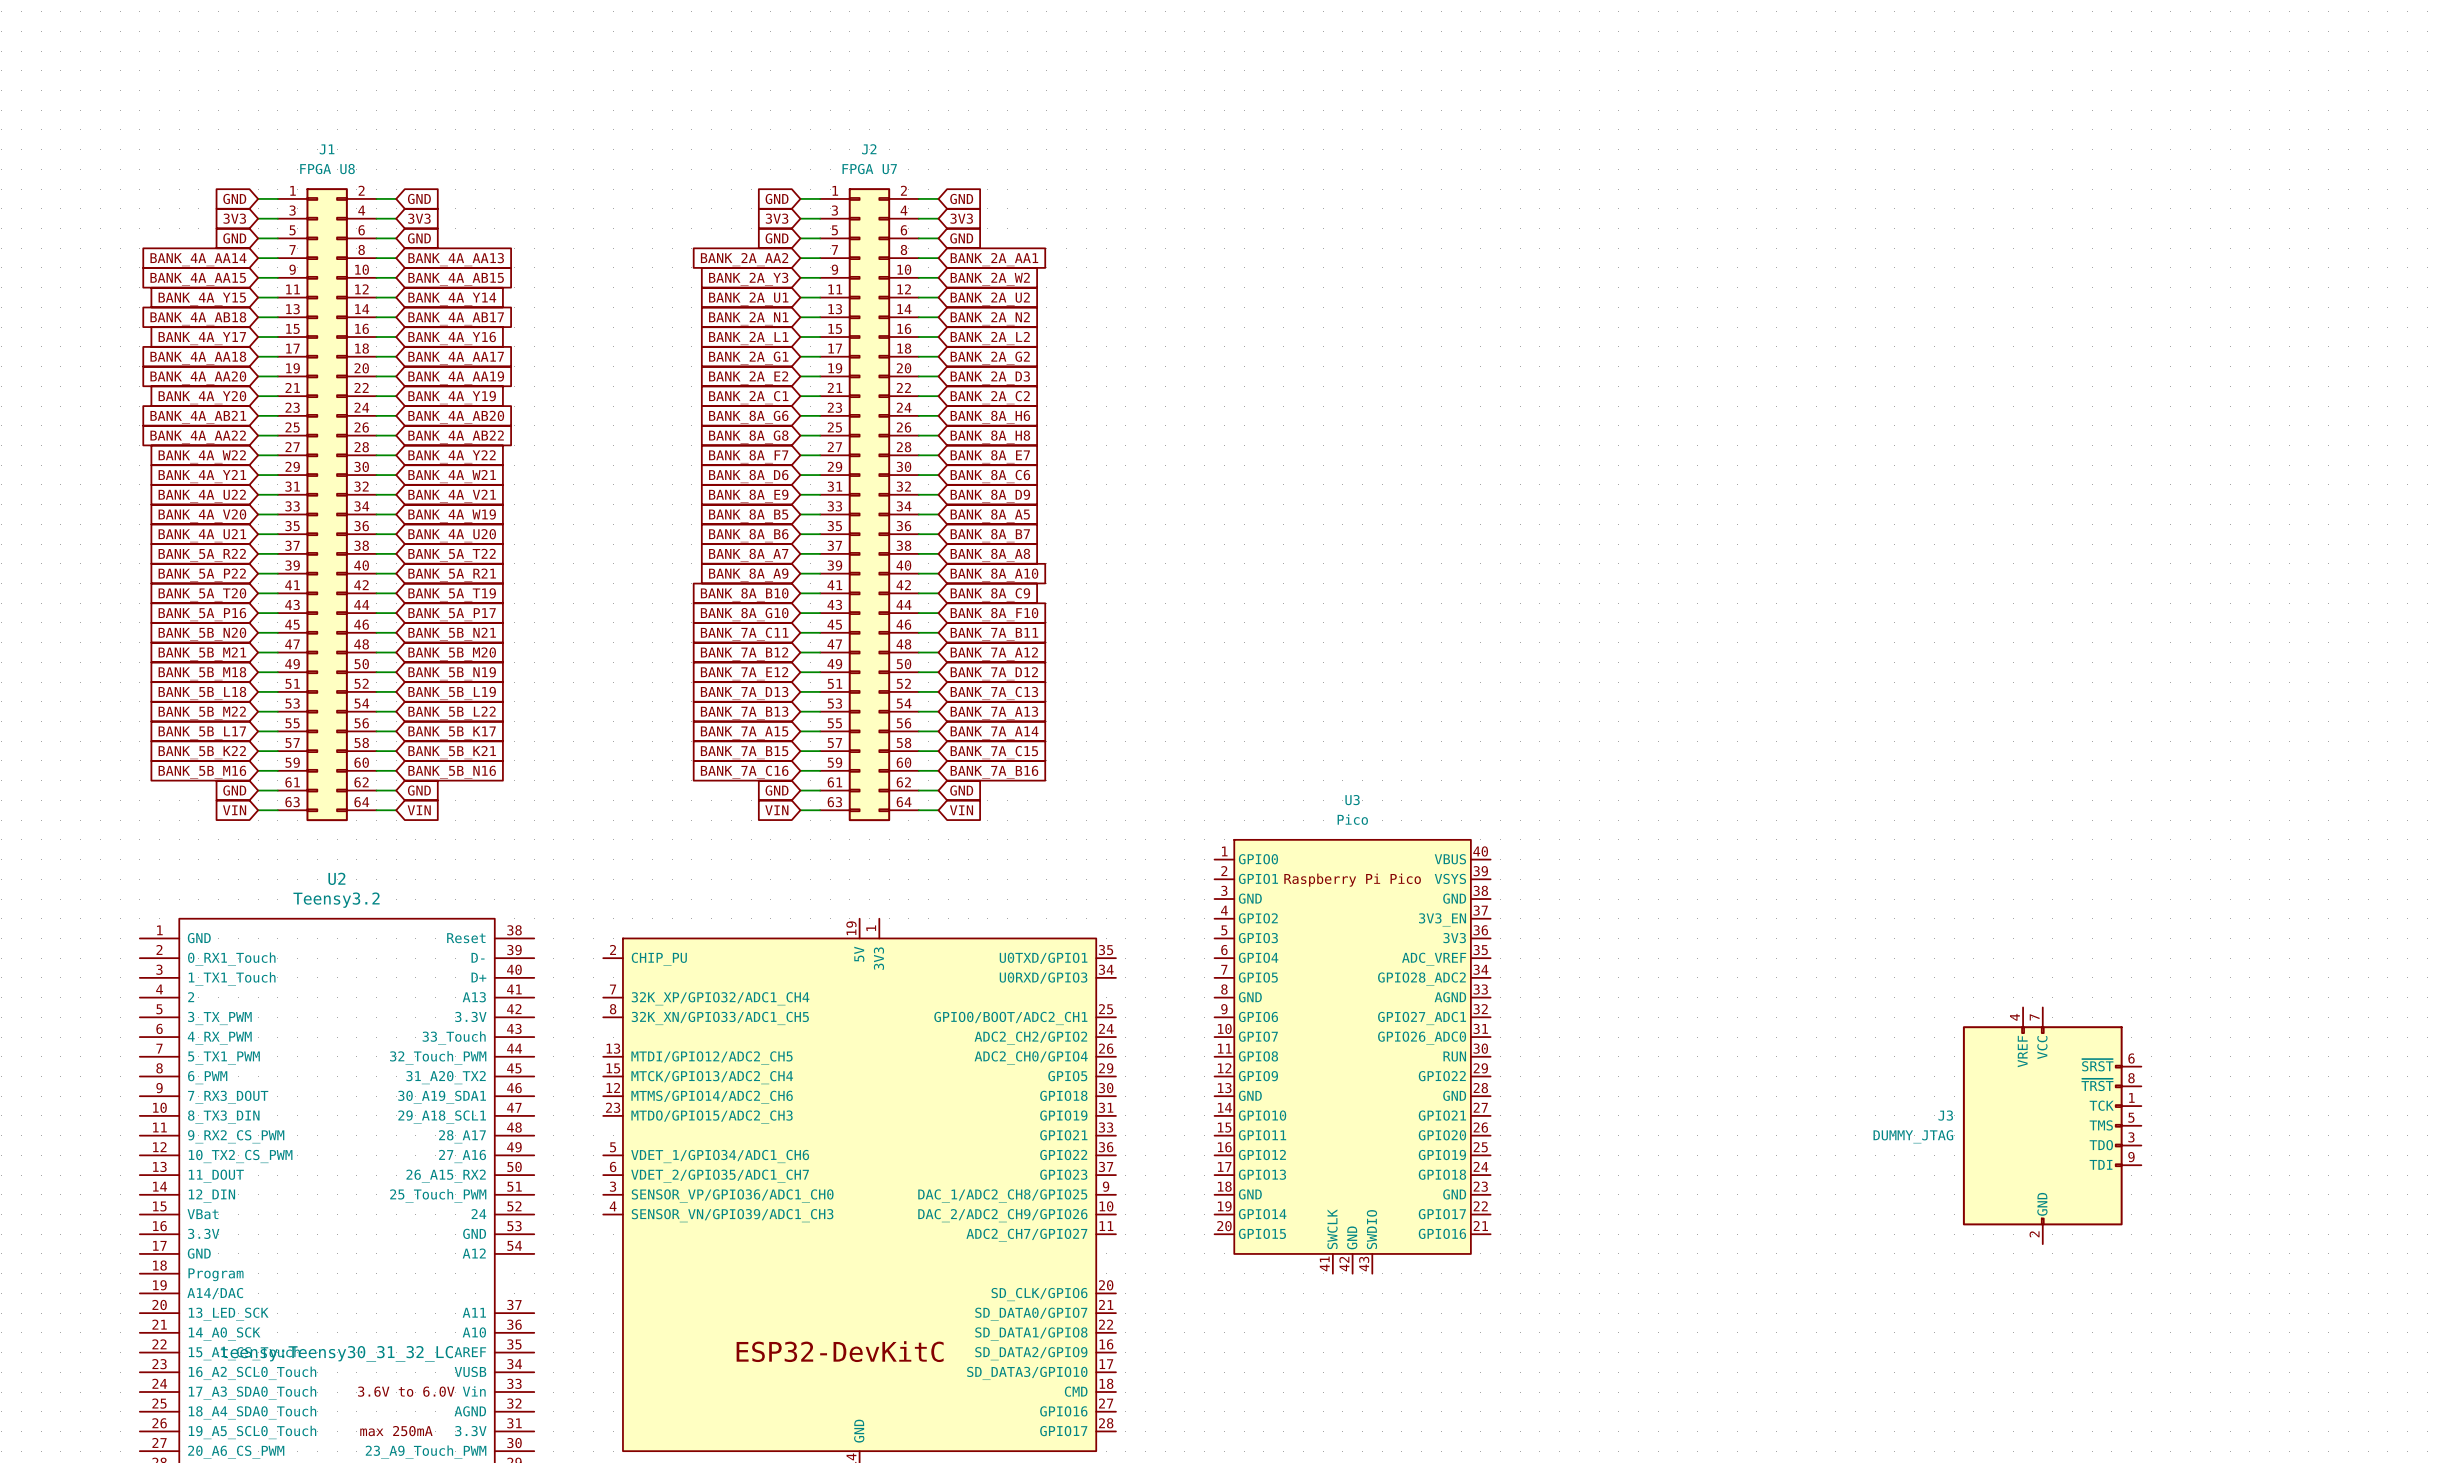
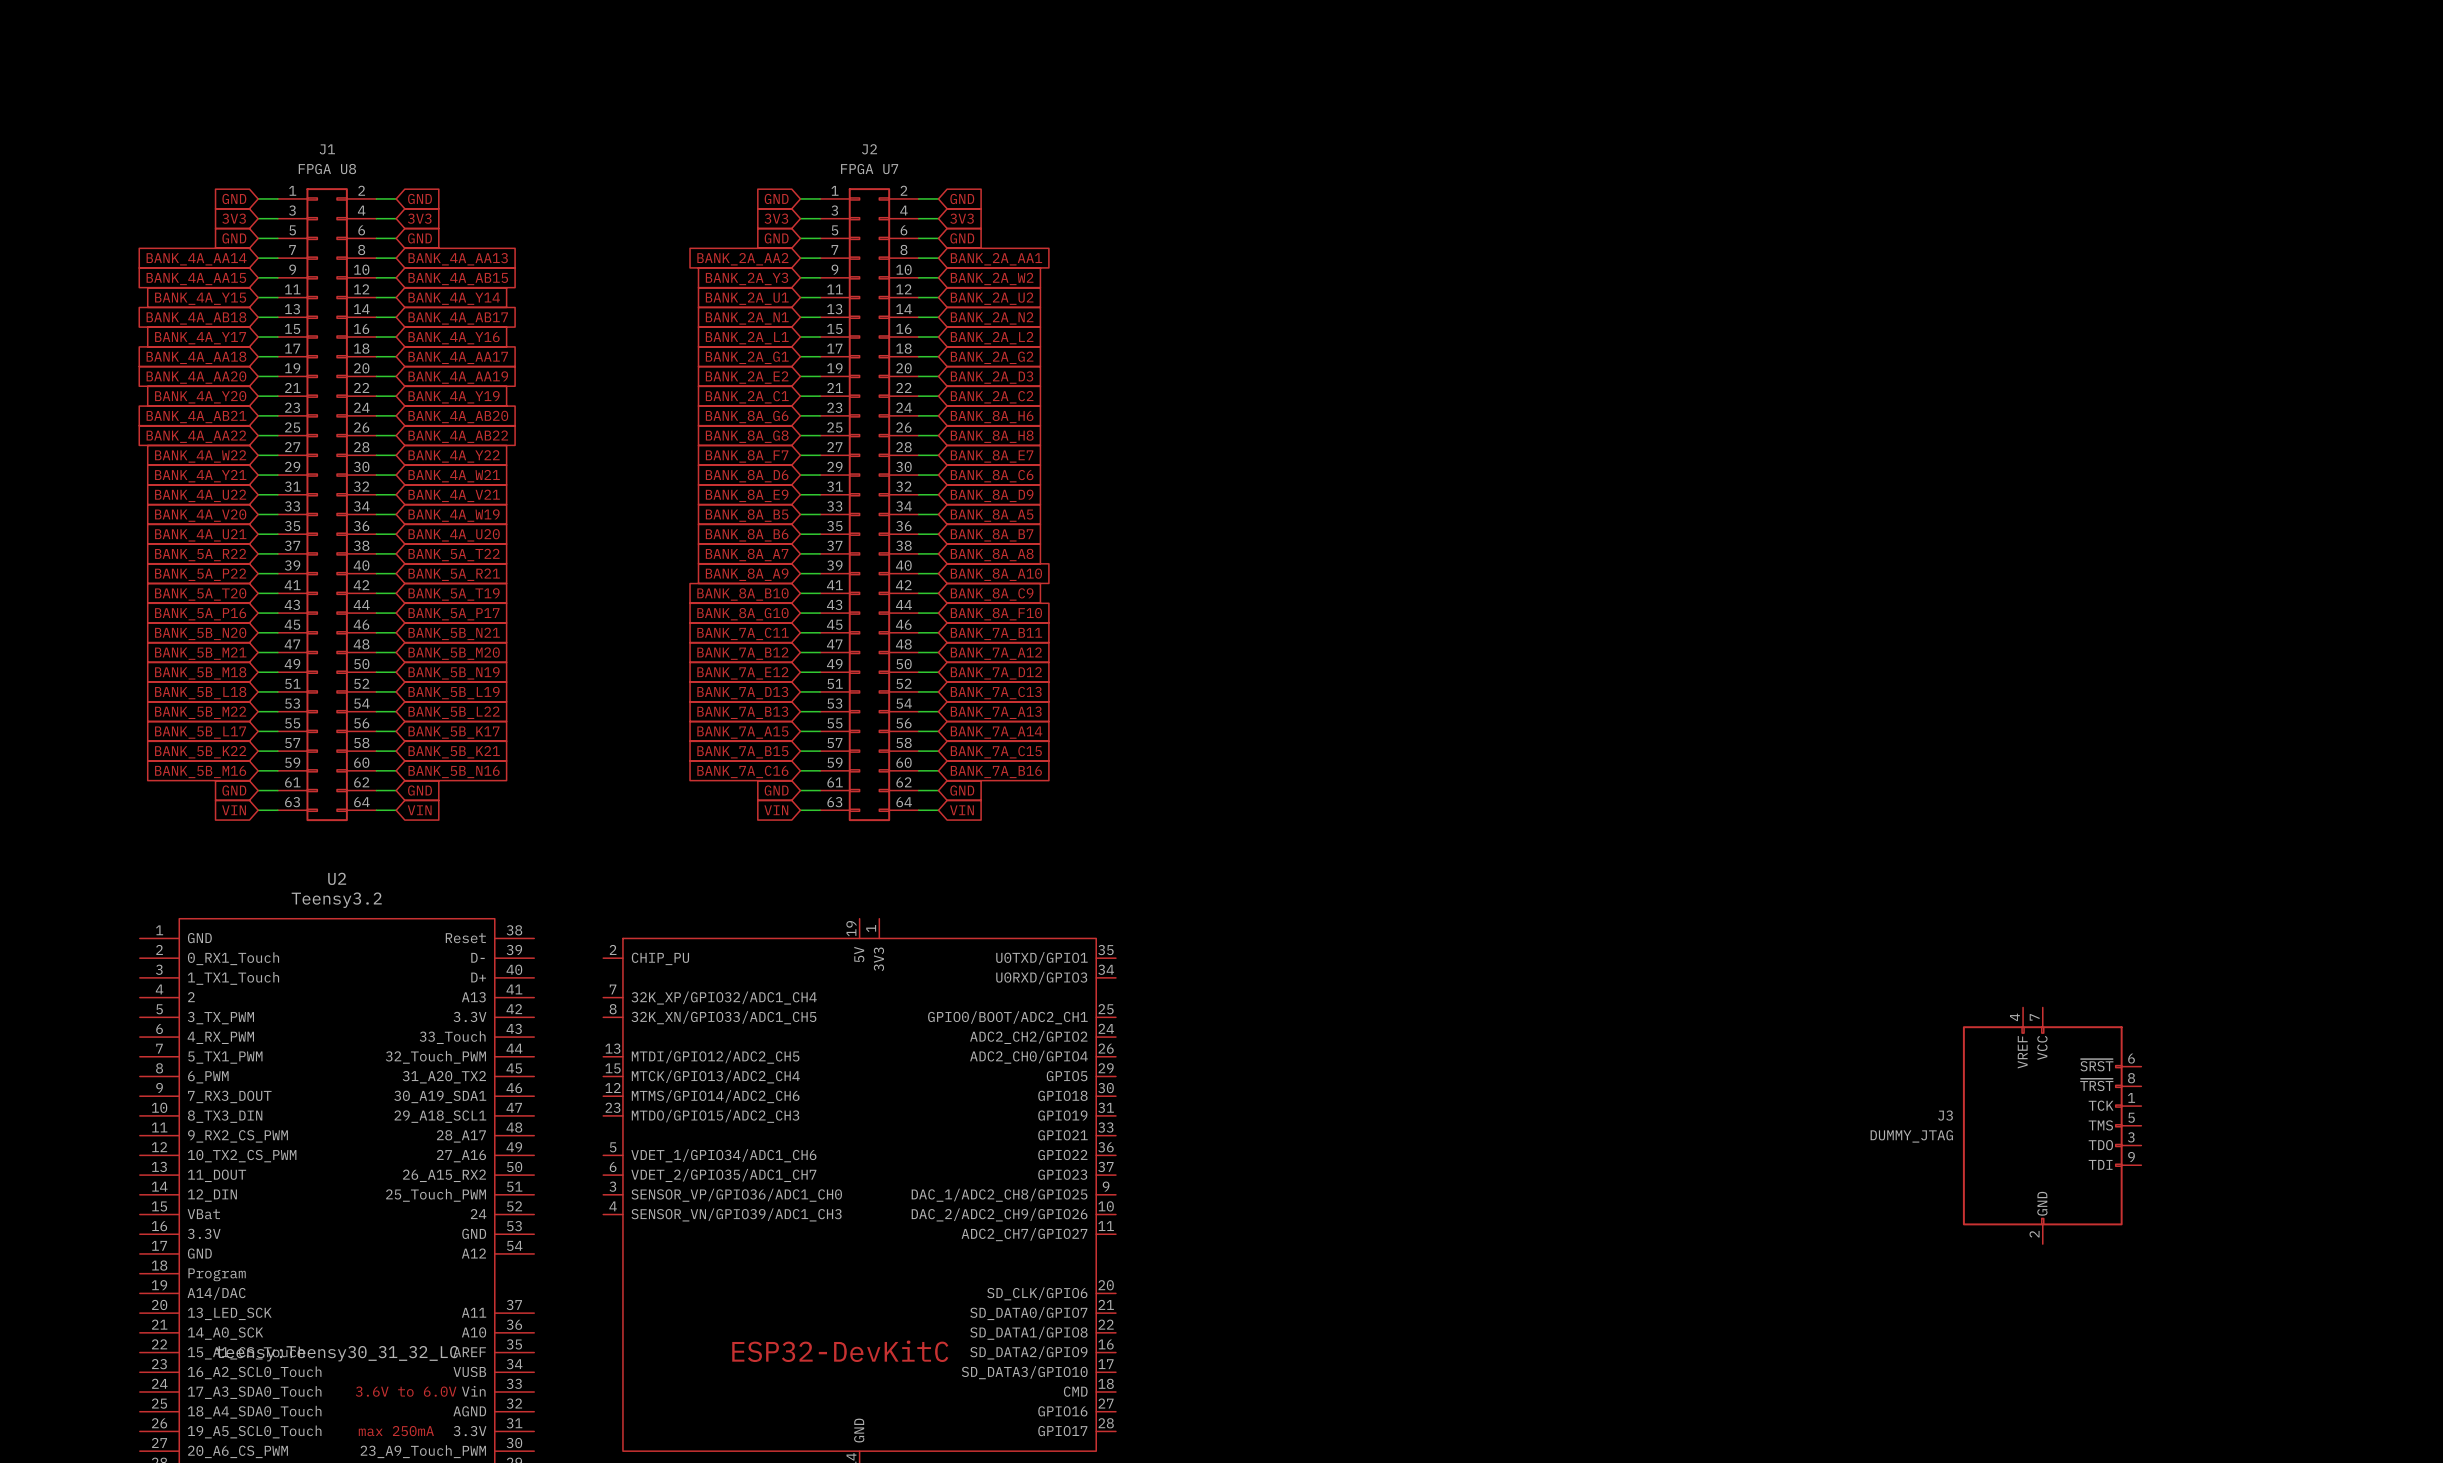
U3: Pico (1352, 1056) -> none

